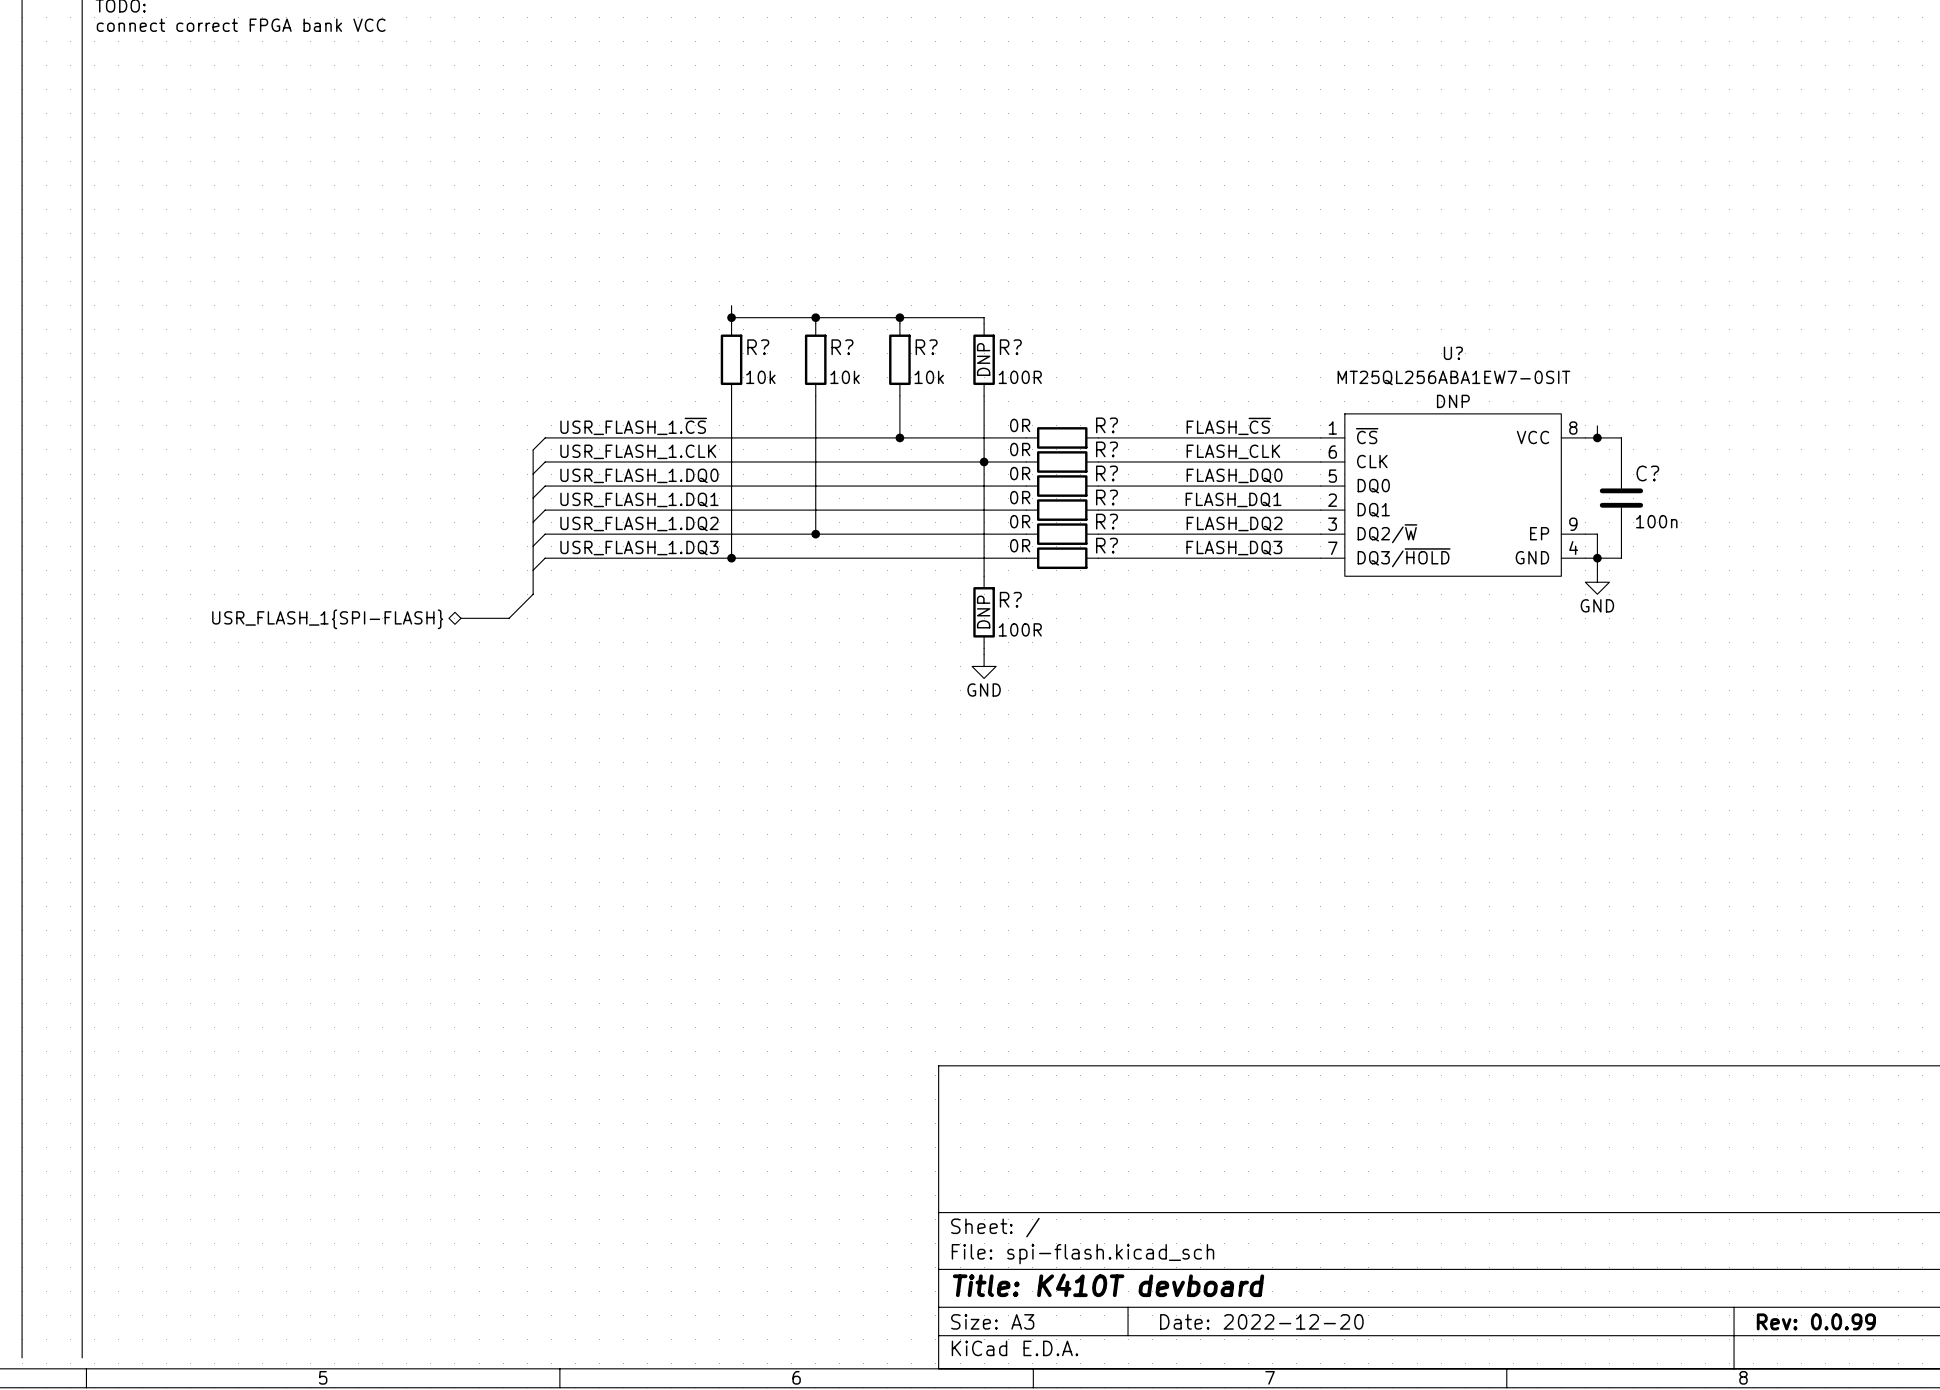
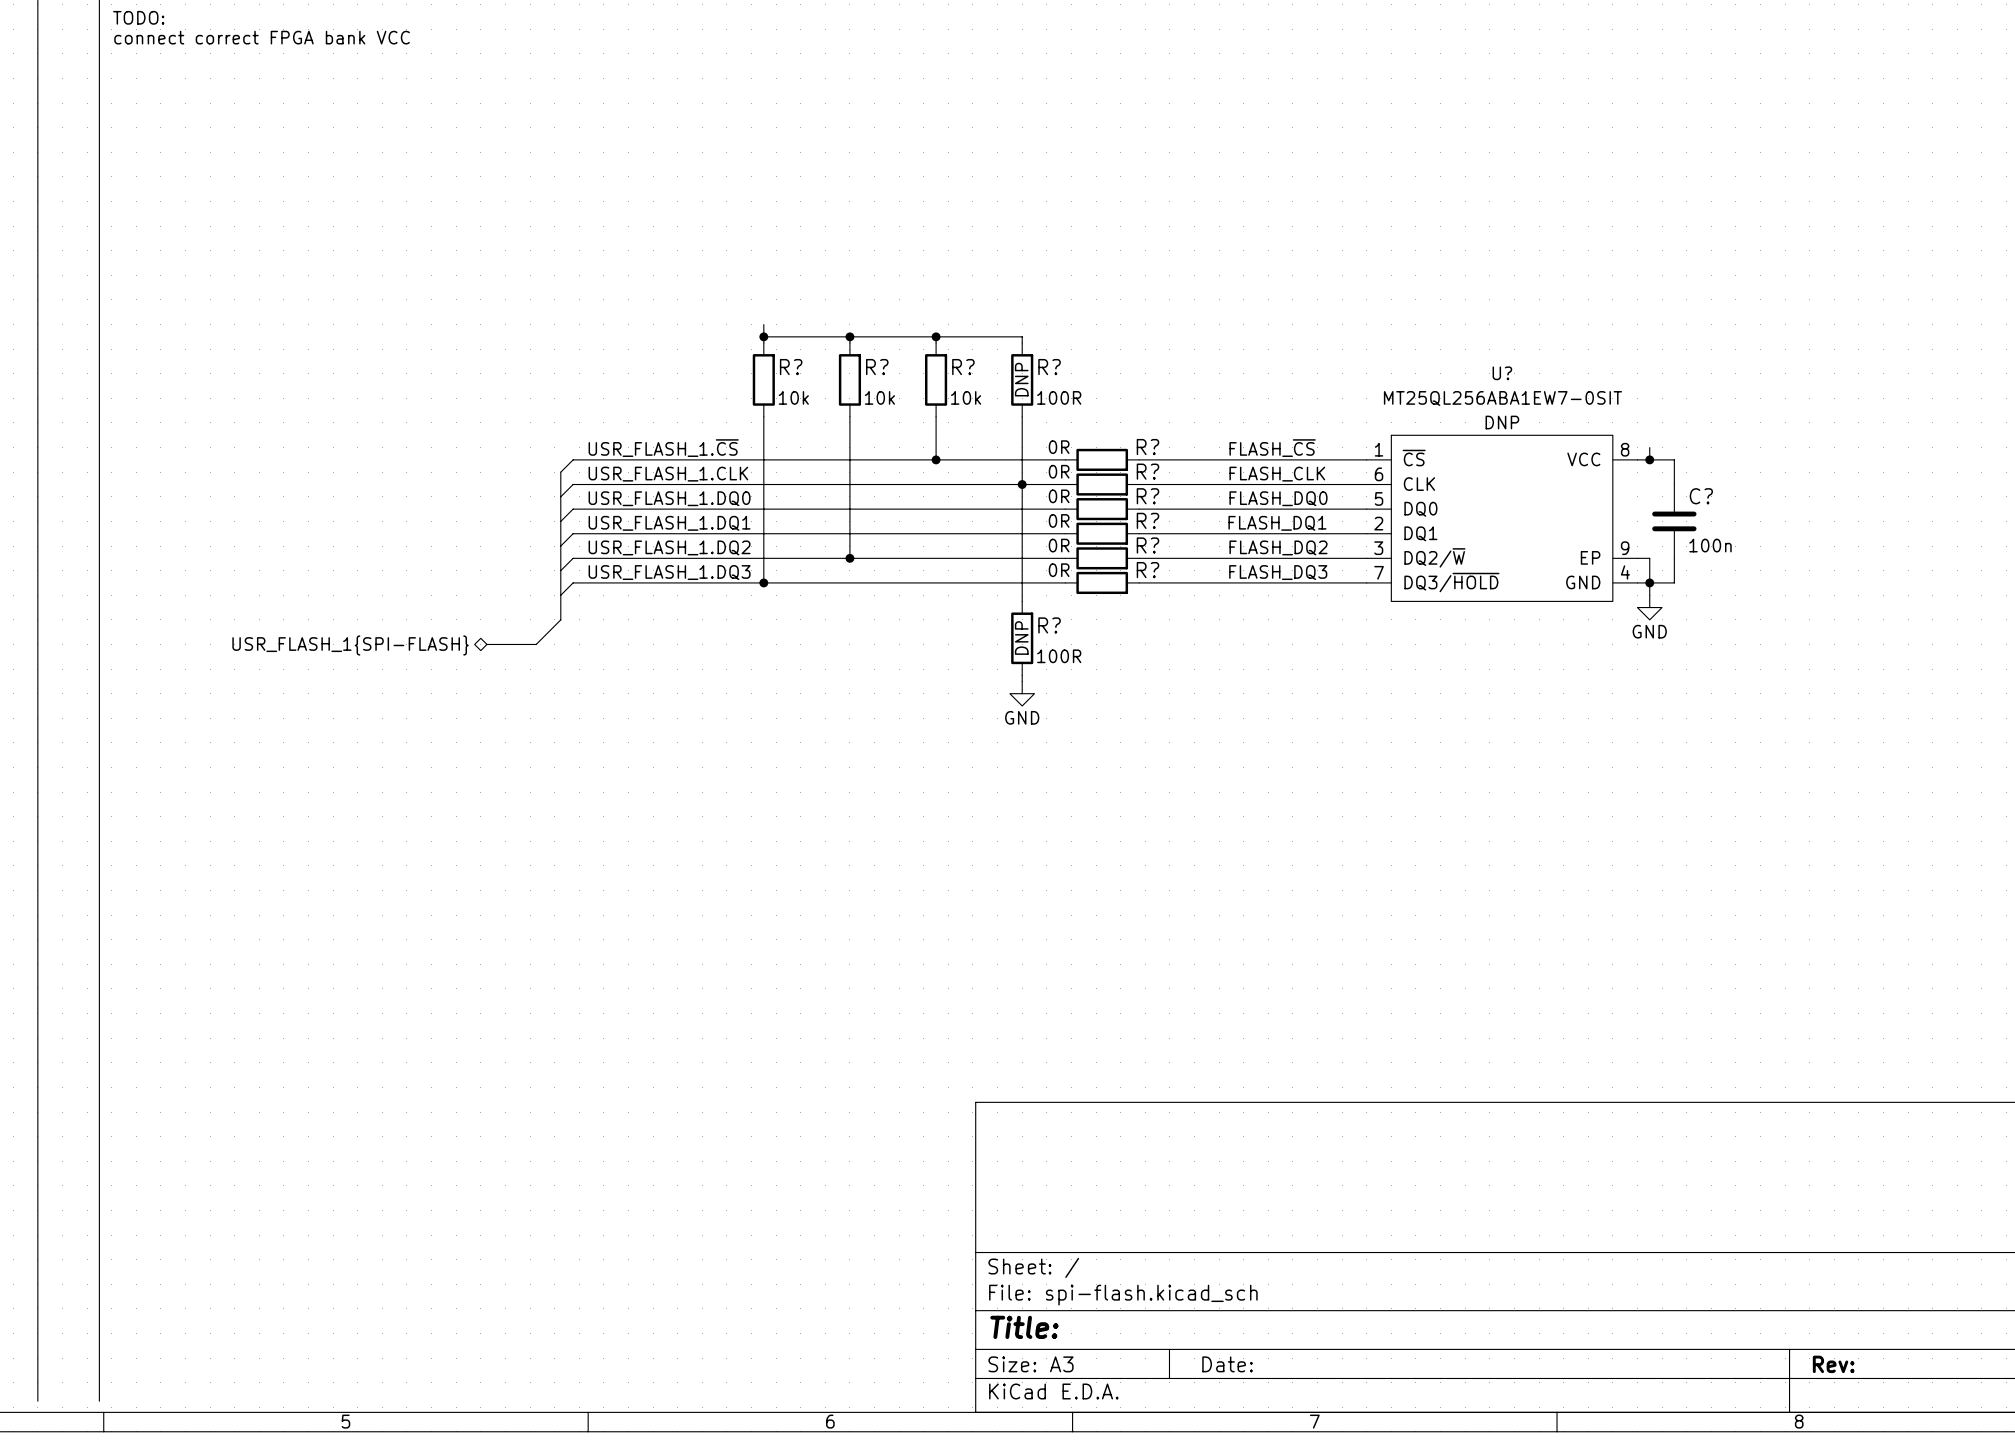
title block: Title: K410T devboard (1108, 1285) -> Title: (1024, 1327)
title block: Date: 2022-12-20 (1261, 1321) -> Date: (1227, 1364)
title block: Rev: 0.0.99 (1816, 1321) -> Rev: (1833, 1364)

